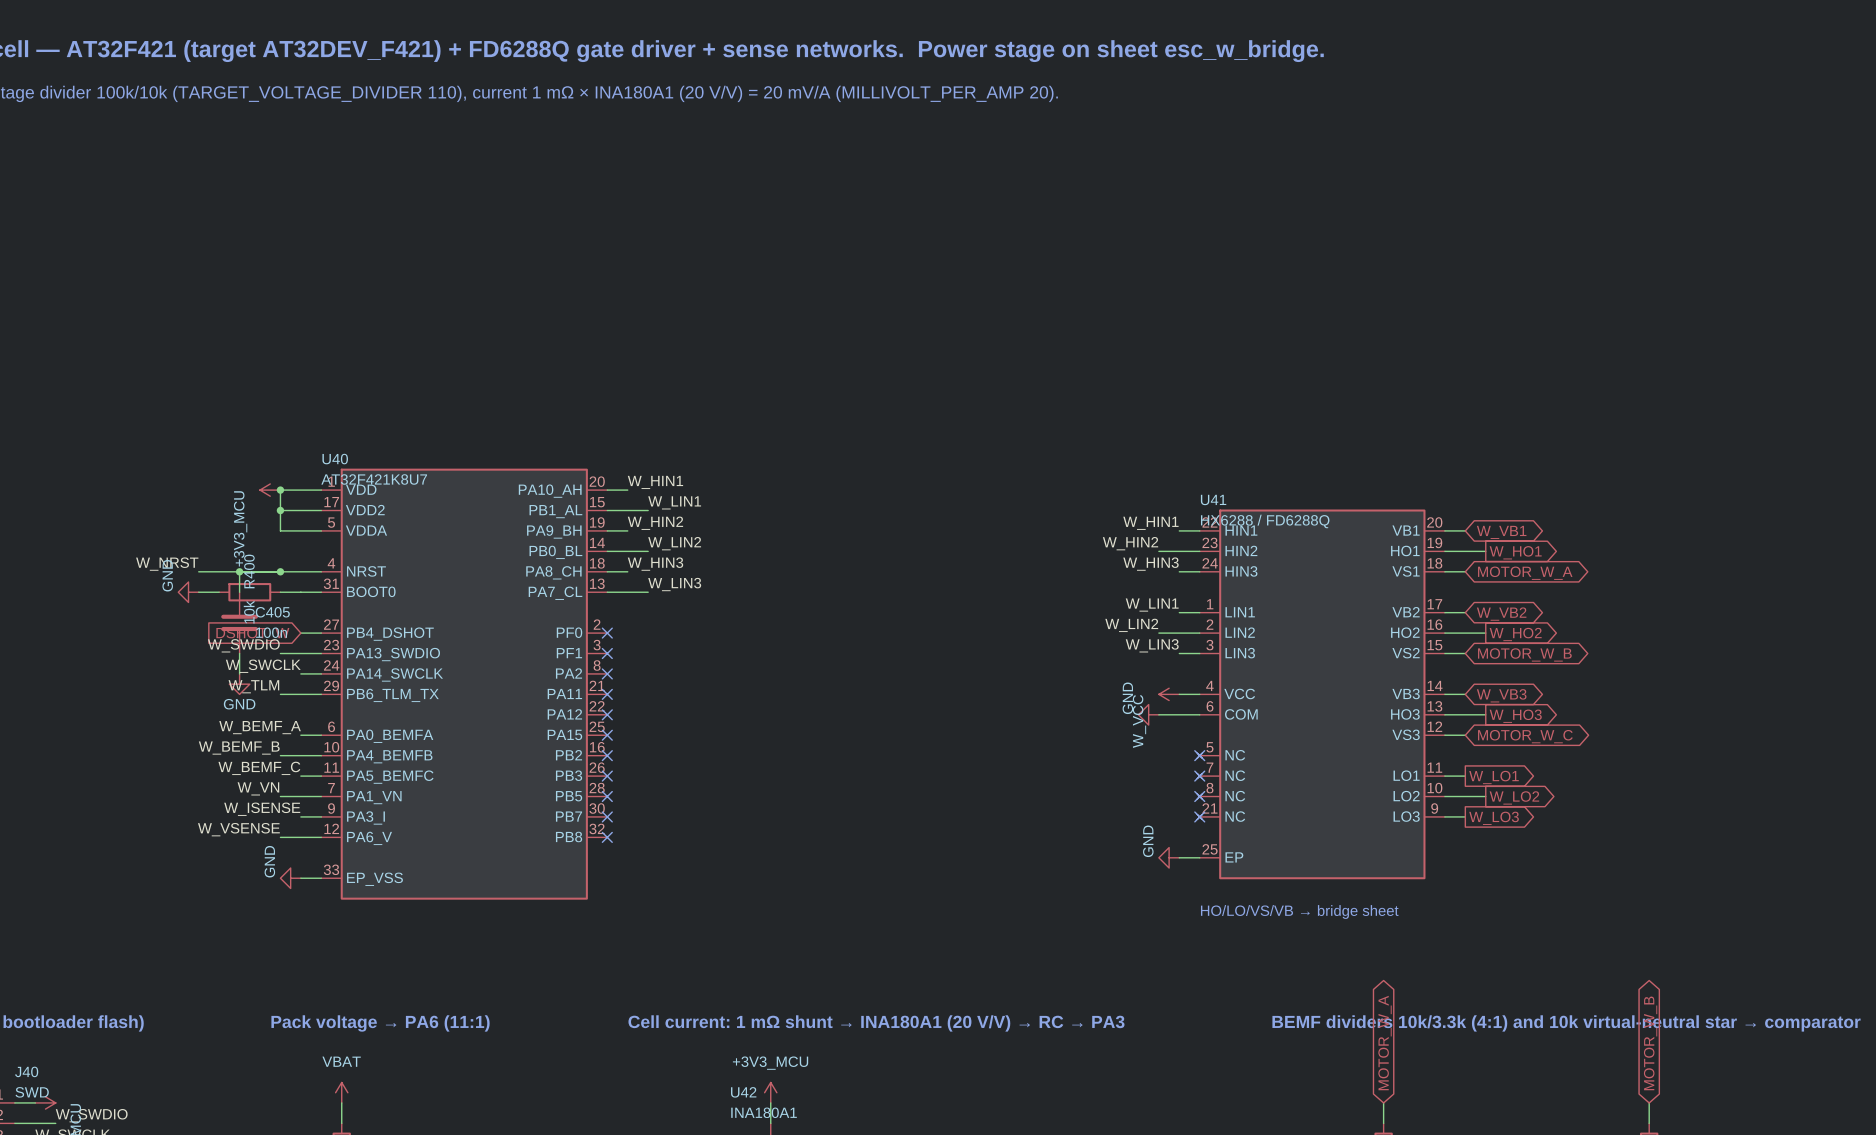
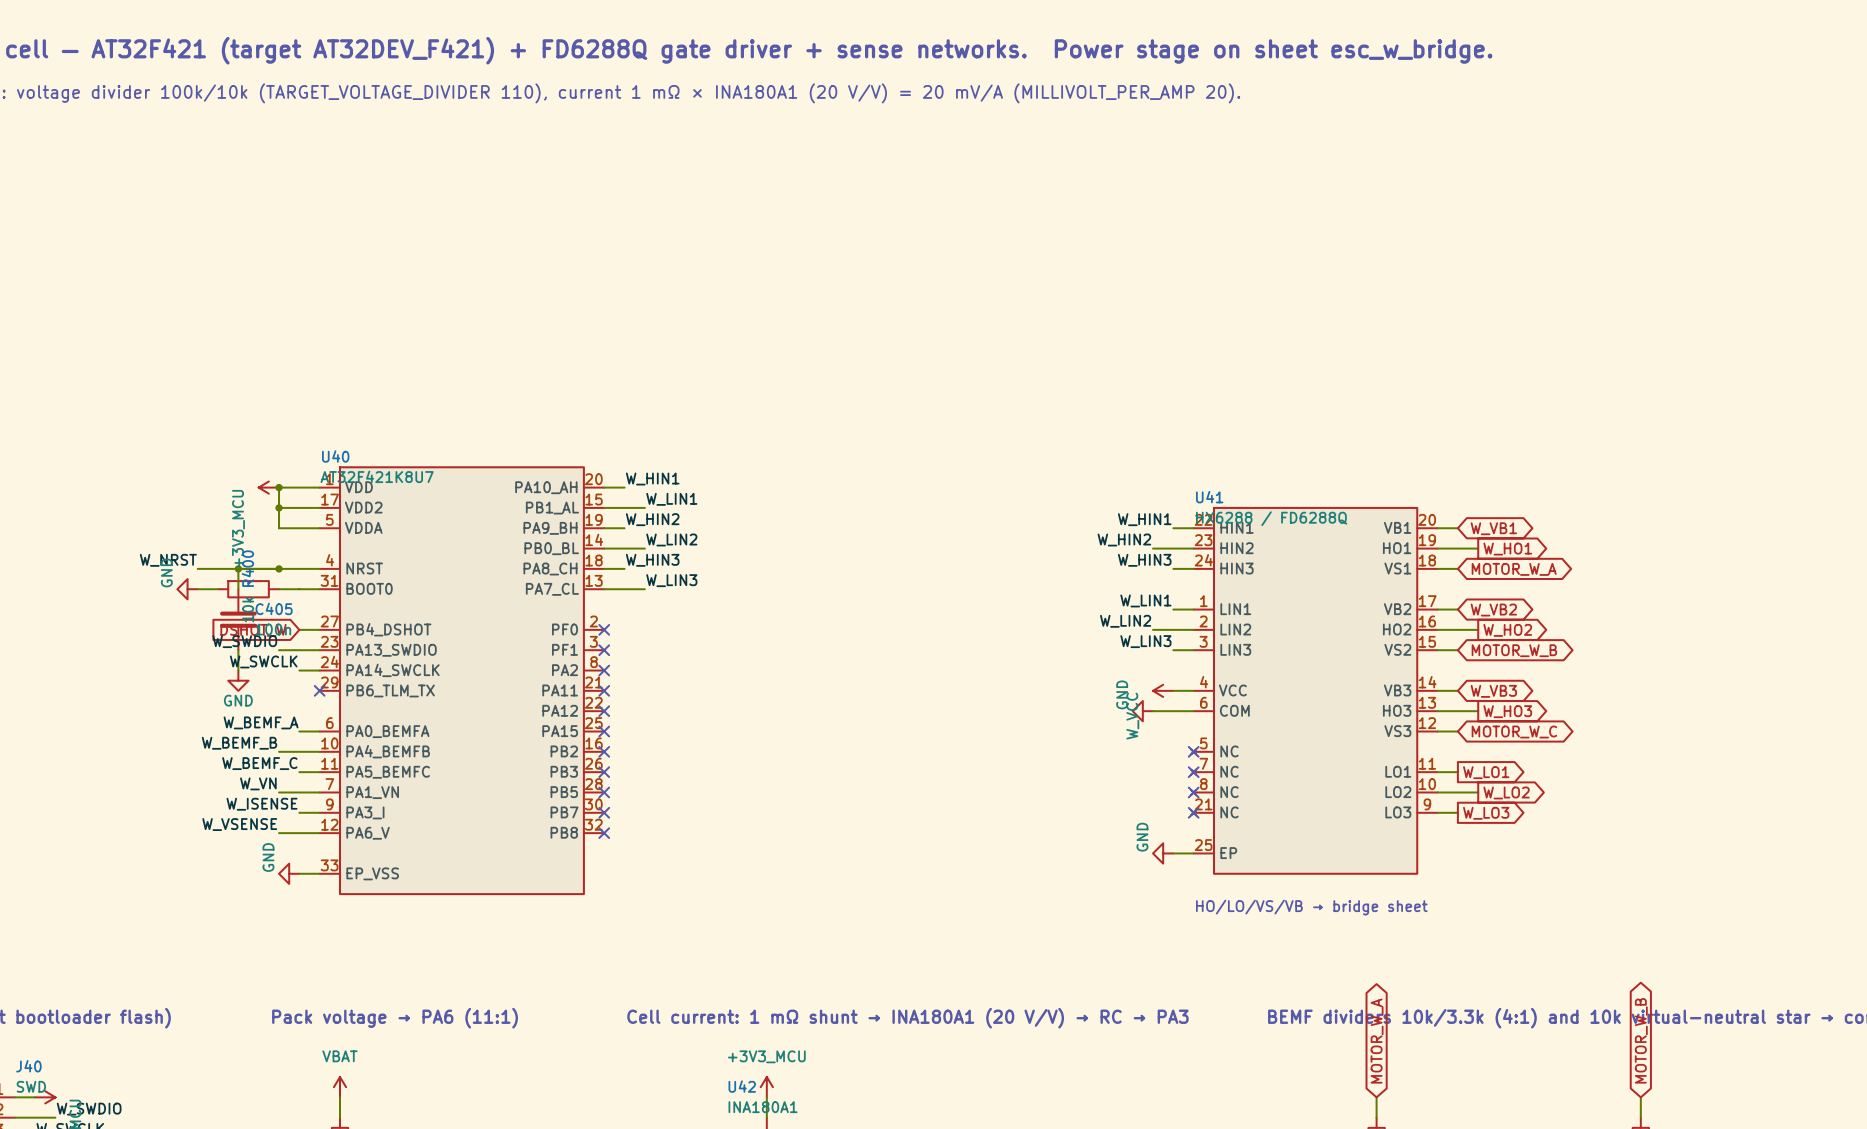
label: W_TLM (253, 686) -> none
wire: (280, 694) (321, 694) -> none
no-connect mark: none -> (319, 690)

